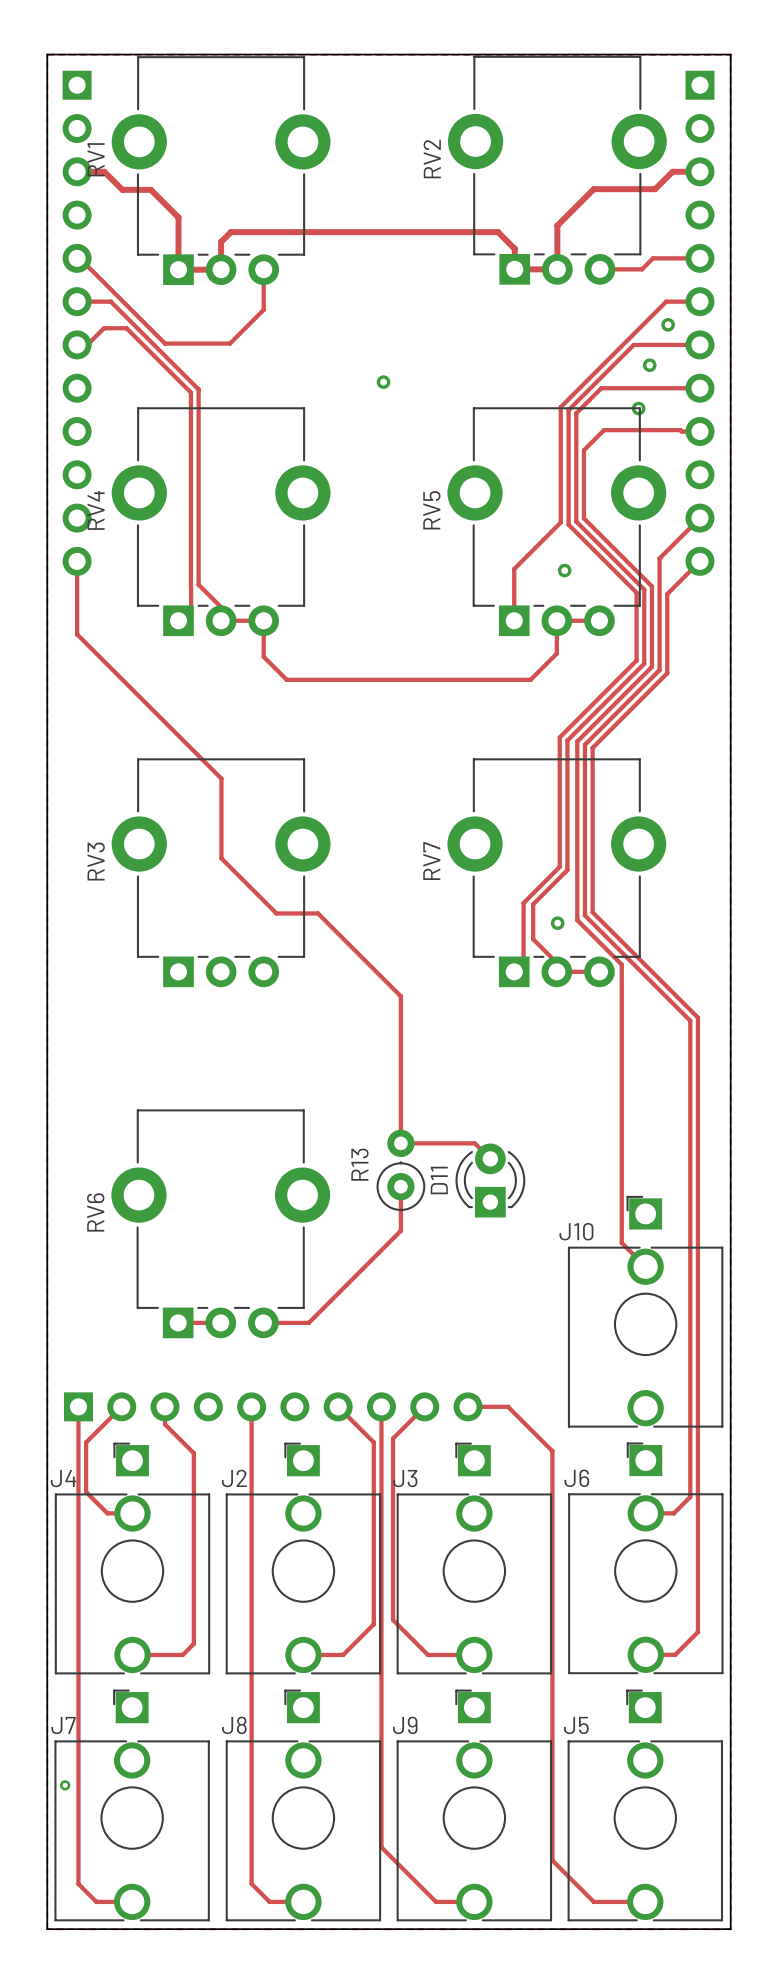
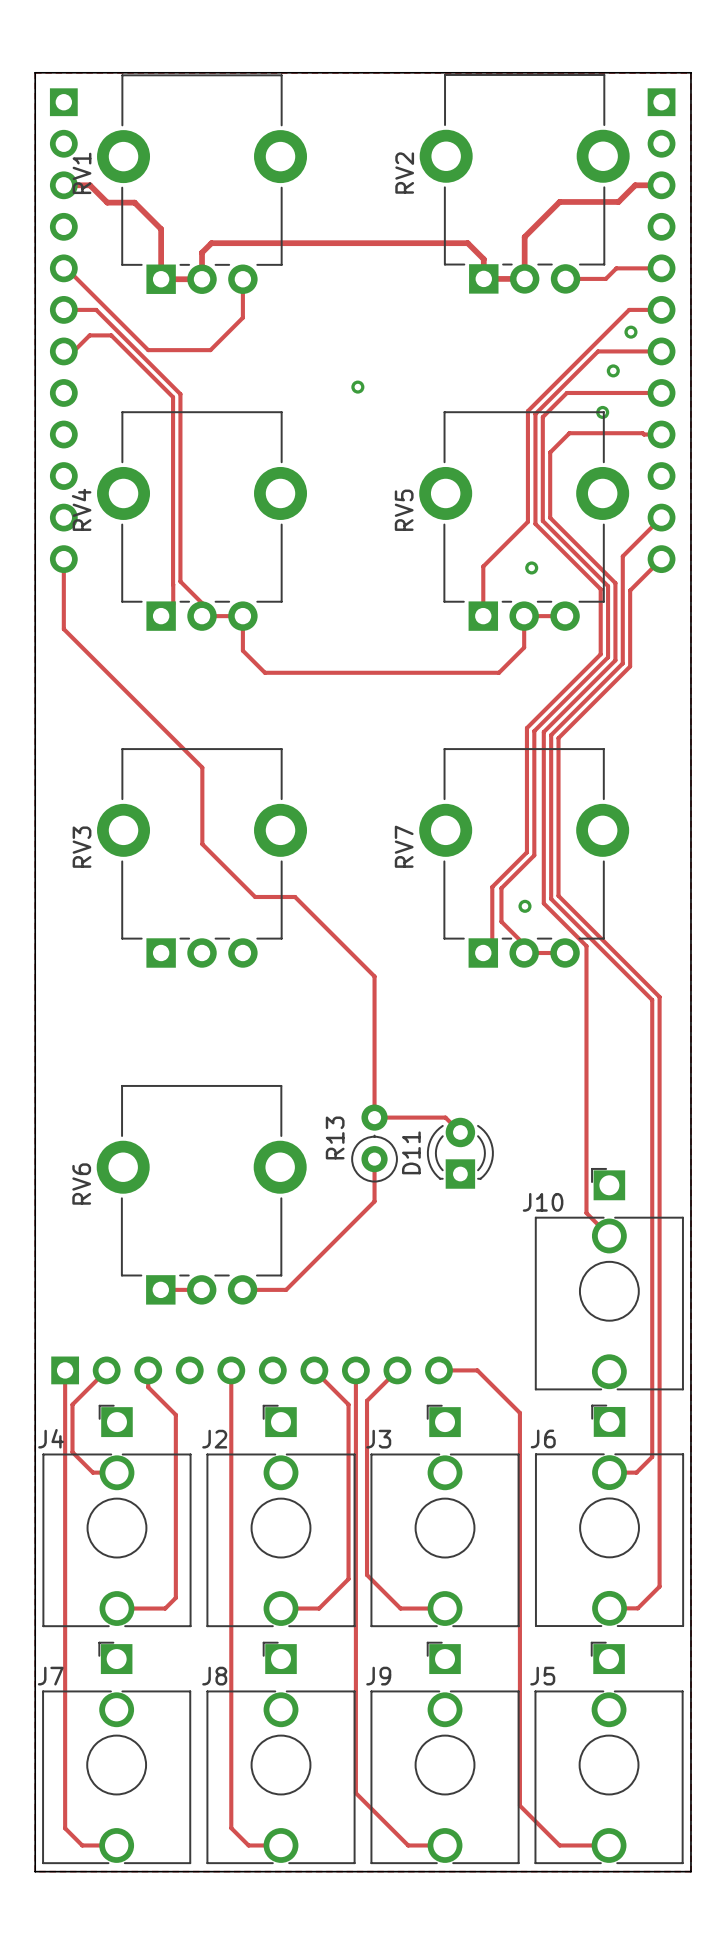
via: (65, 1785) -> none

